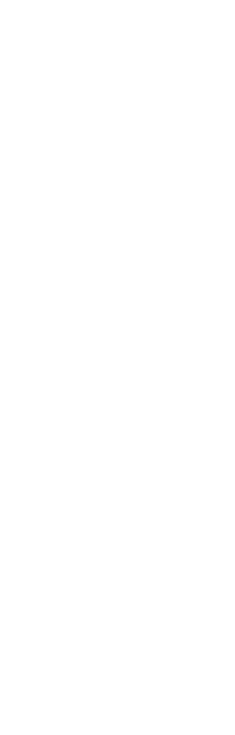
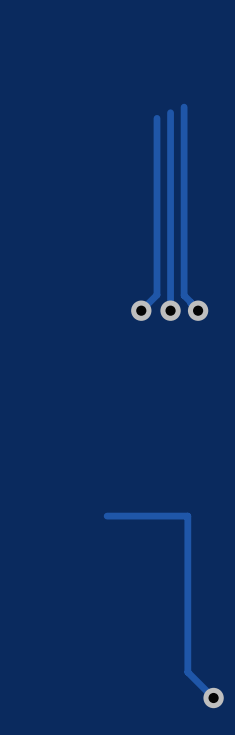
track: none -> (184, 107) (184, 295) (198, 310)
track: none -> (170, 112) (170, 310)
track: none -> (157, 118) (157, 294) (141, 310) (146, 310)
via: none -> (141, 310)
via: none -> (170, 310)
via: none -> (198, 310)
track: none -> (107, 516) (187, 516) (187, 672) (213, 698)
via: none -> (213, 698)

